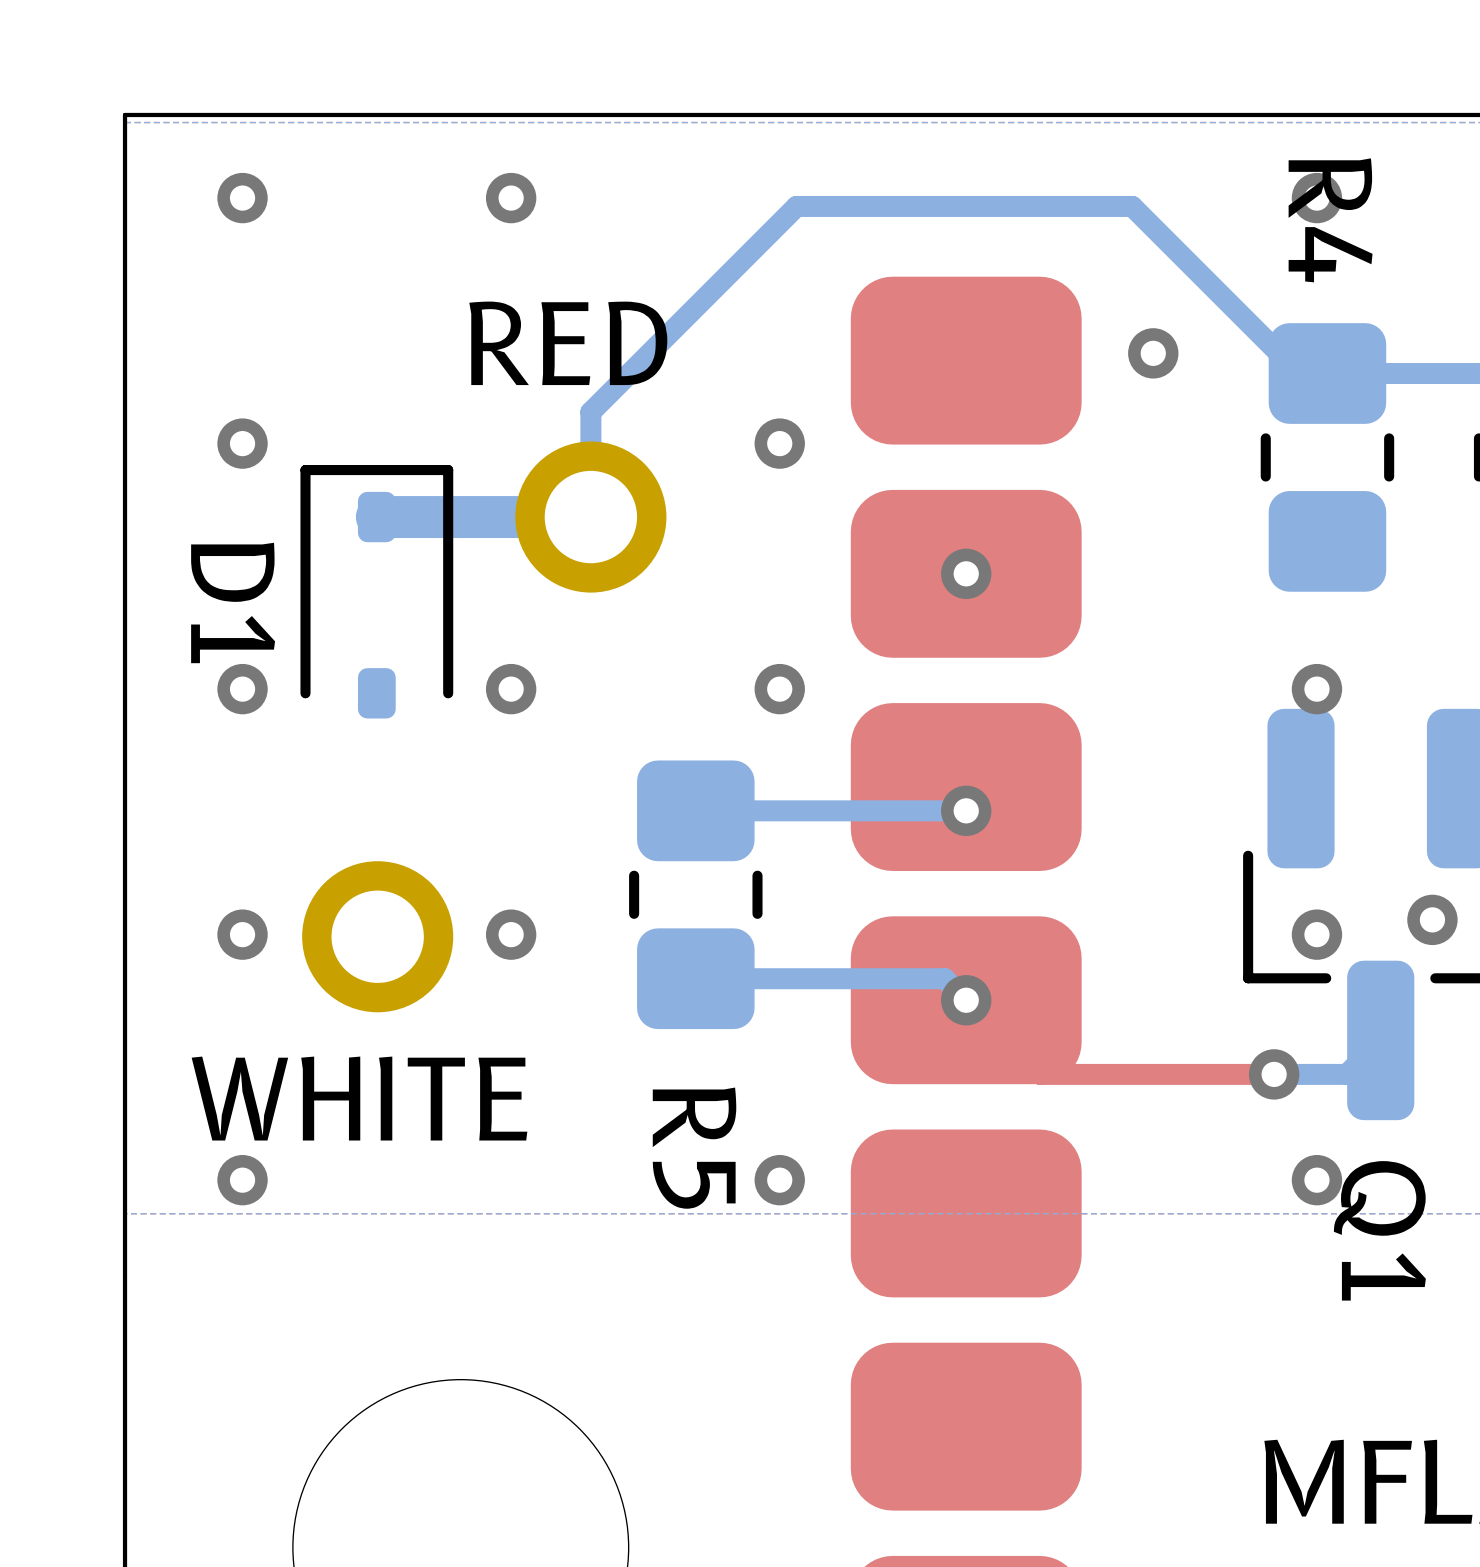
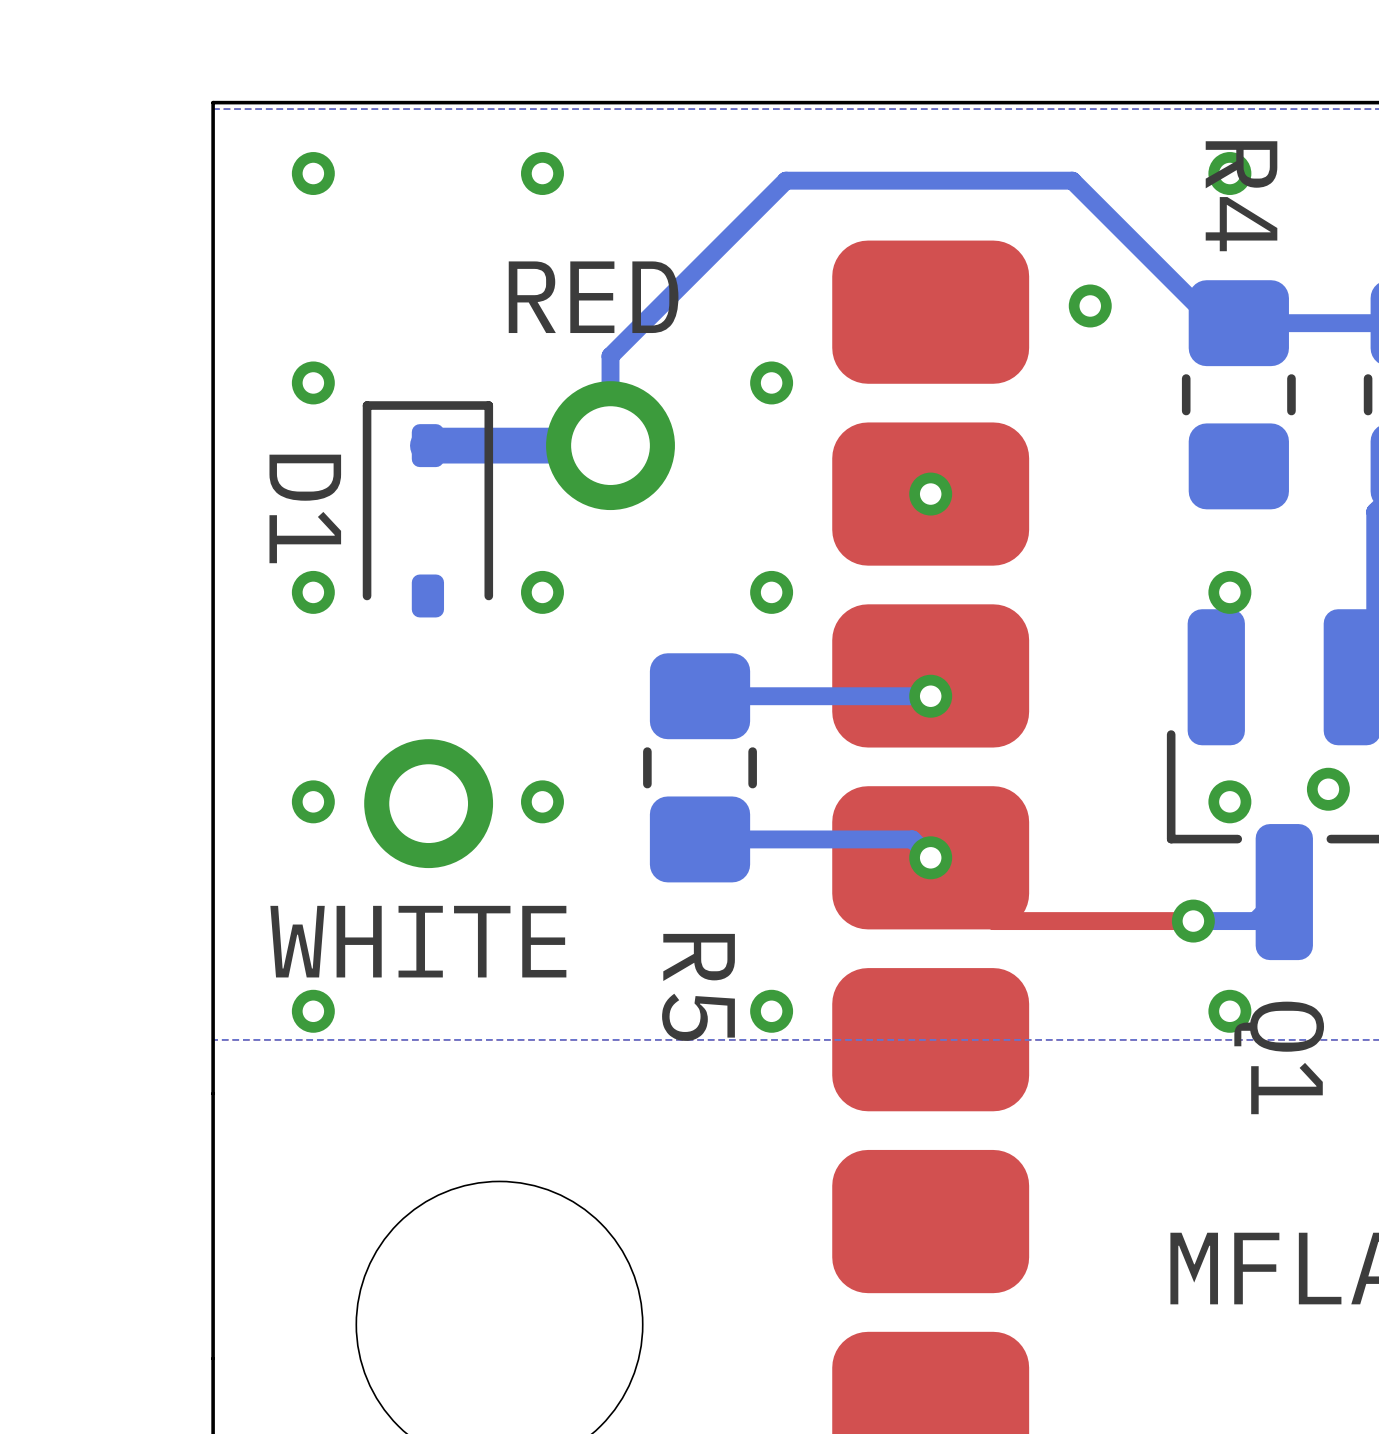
D1 name position: D1 (233, 602) -> D1 (305, 508)

